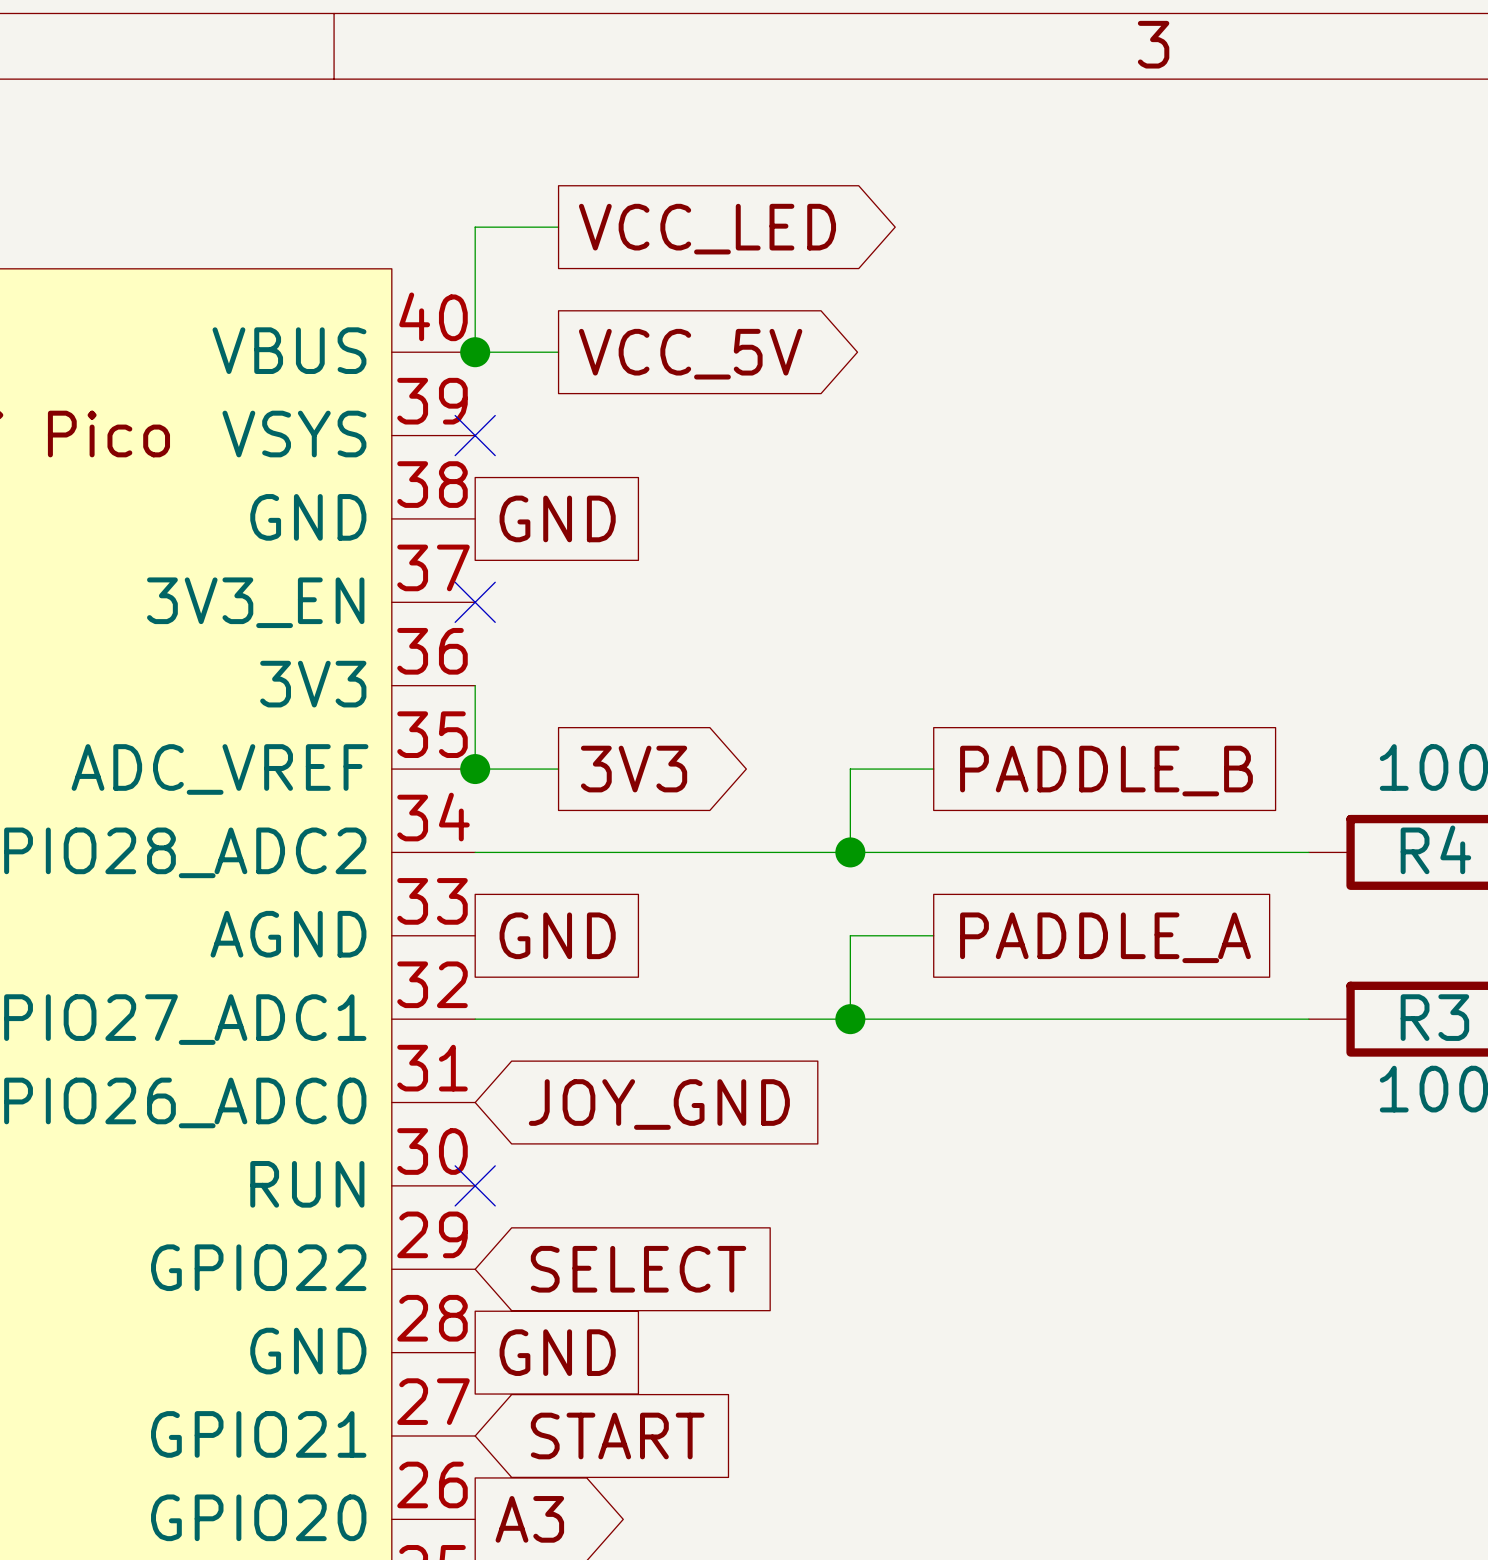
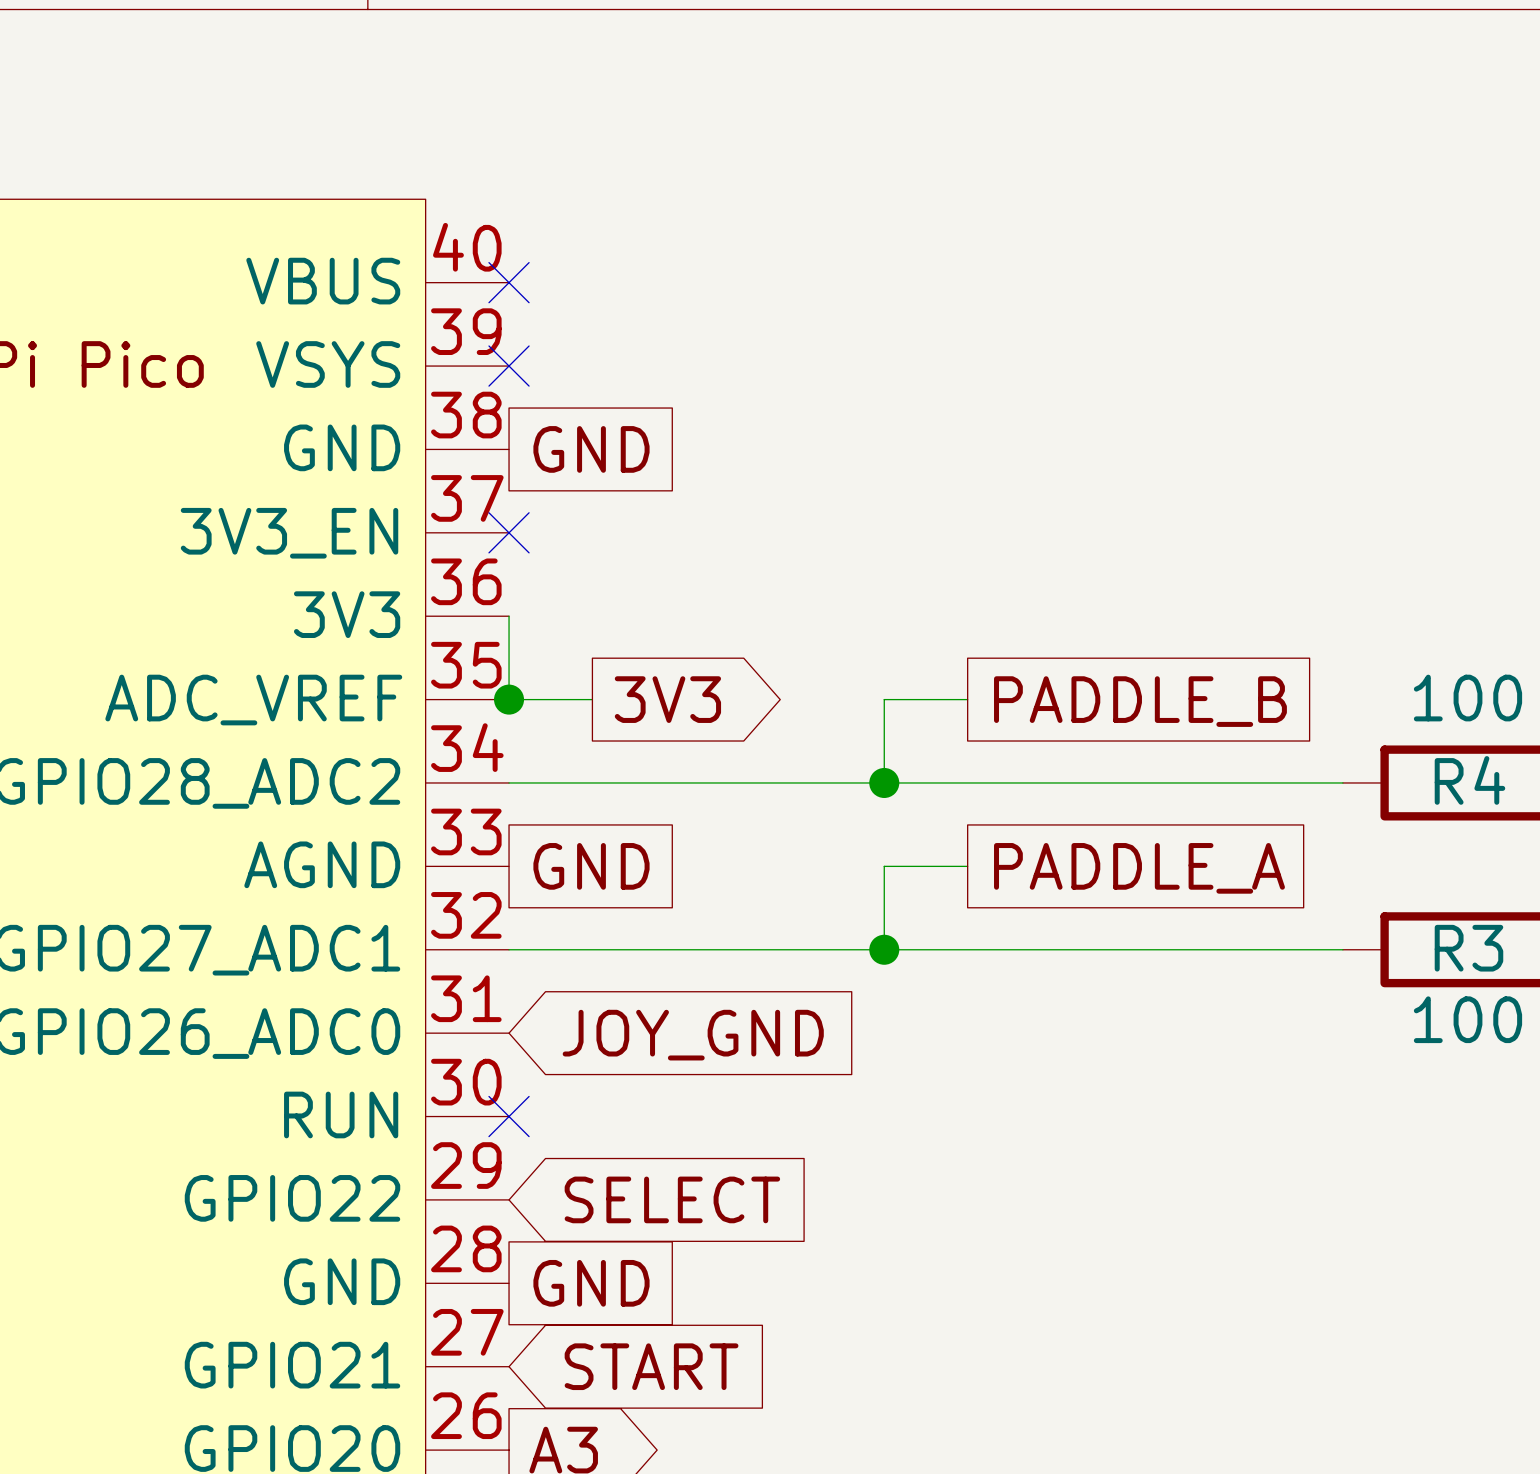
wire: (558, 227) (475, 227) (475, 352) (558, 352) -> none
global label: VCC_LED (707, 229) -> none
junction: (475, 352) -> none
no-connect mark: none -> (509, 282)
global label: VCC_5V (690, 354) -> none

